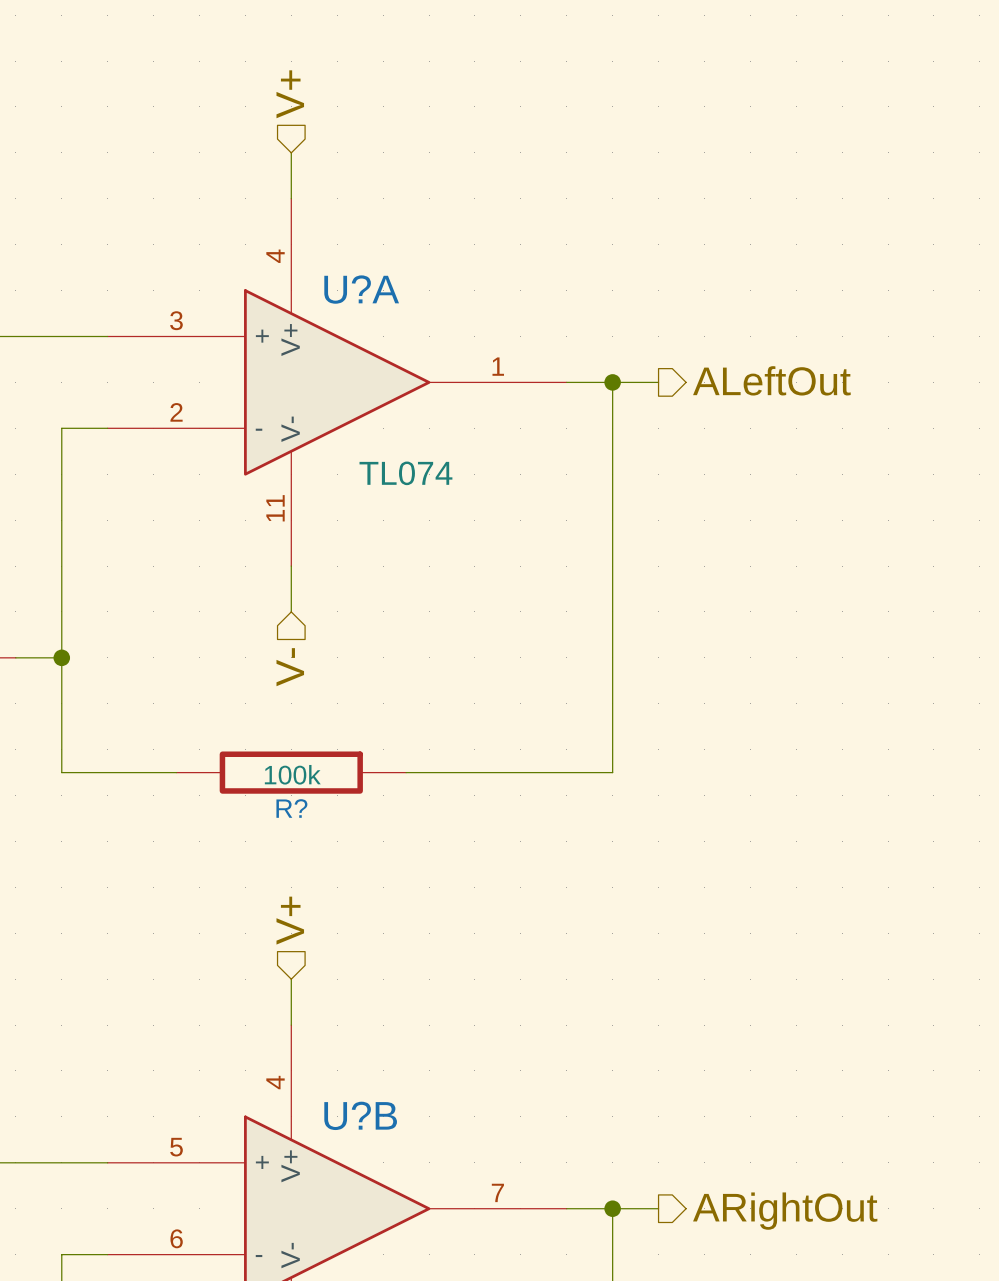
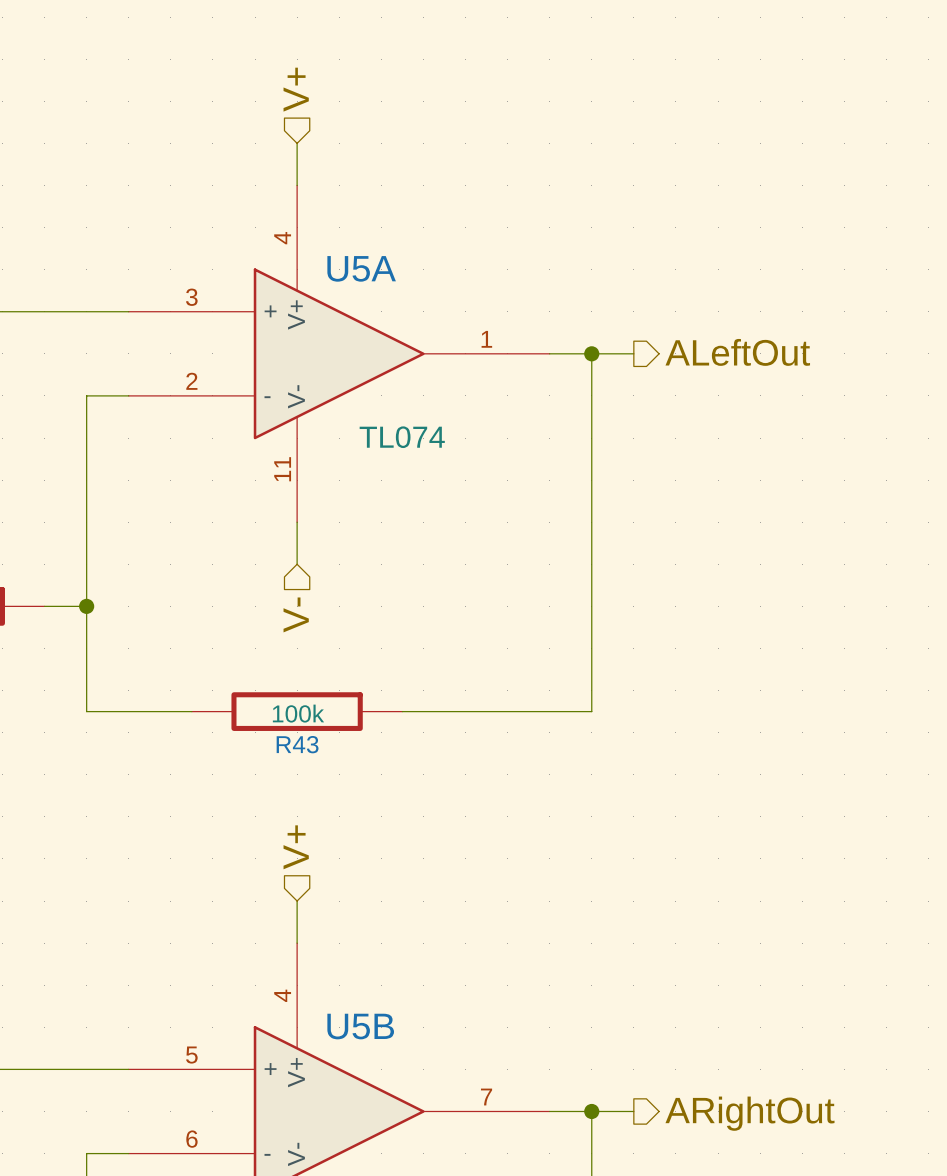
U?A name: U?A (361, 289) -> U5A (361, 268)
R? name: R? (291, 808) -> R43 (297, 744)
U?B name: U?B (360, 1115) -> U5B (360, 1026)

